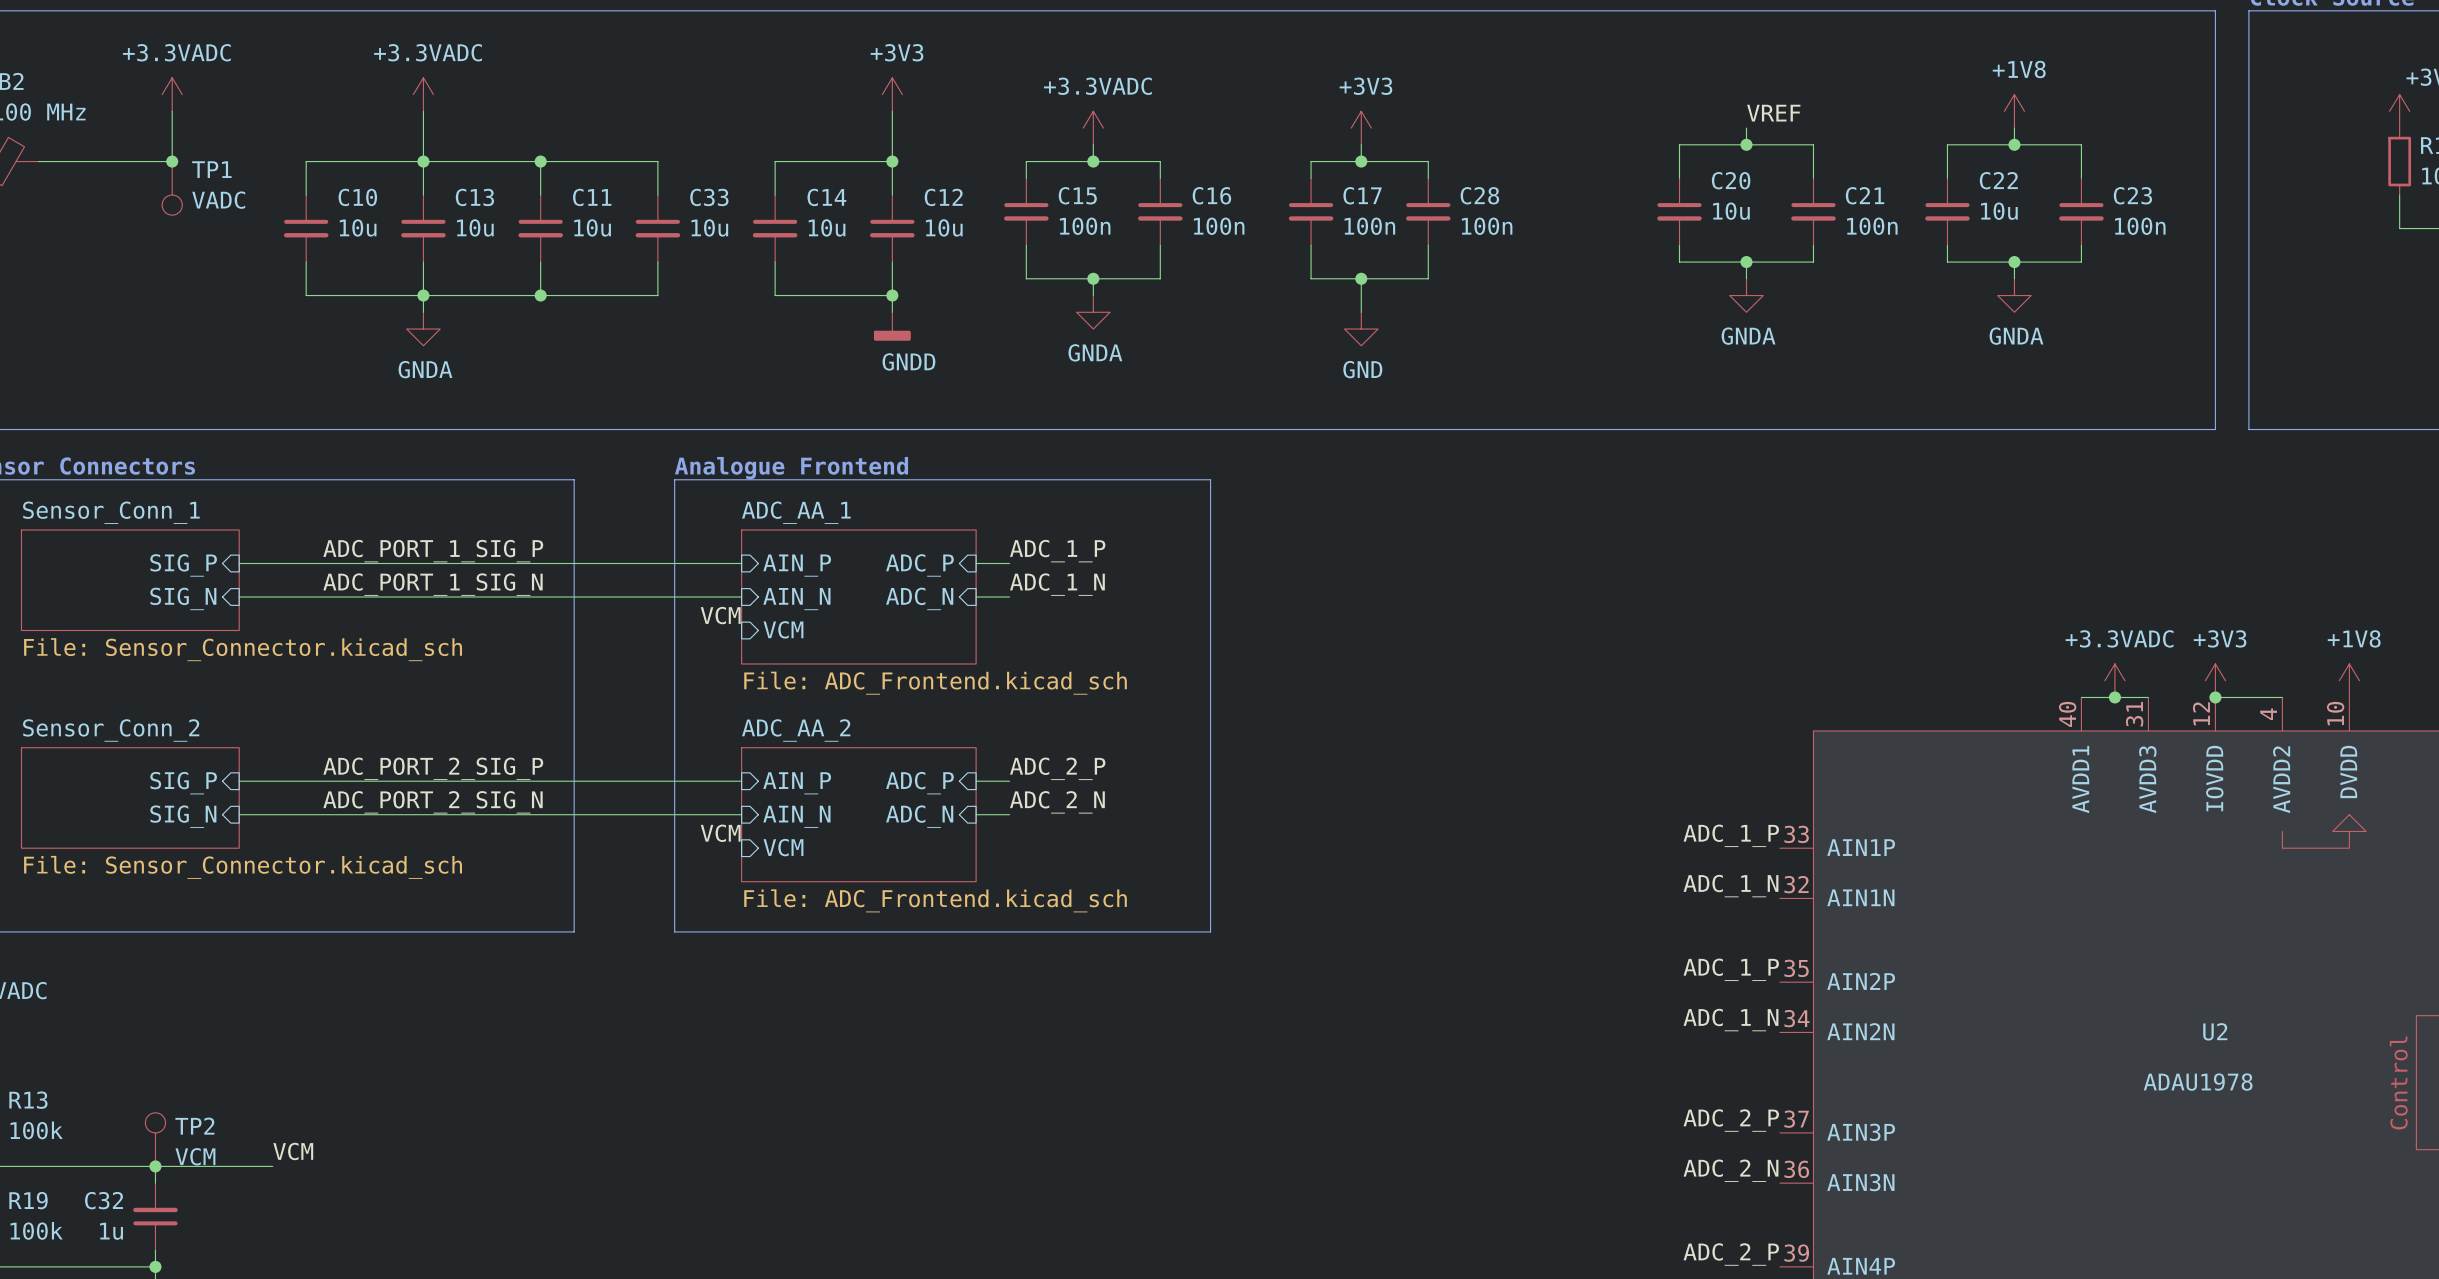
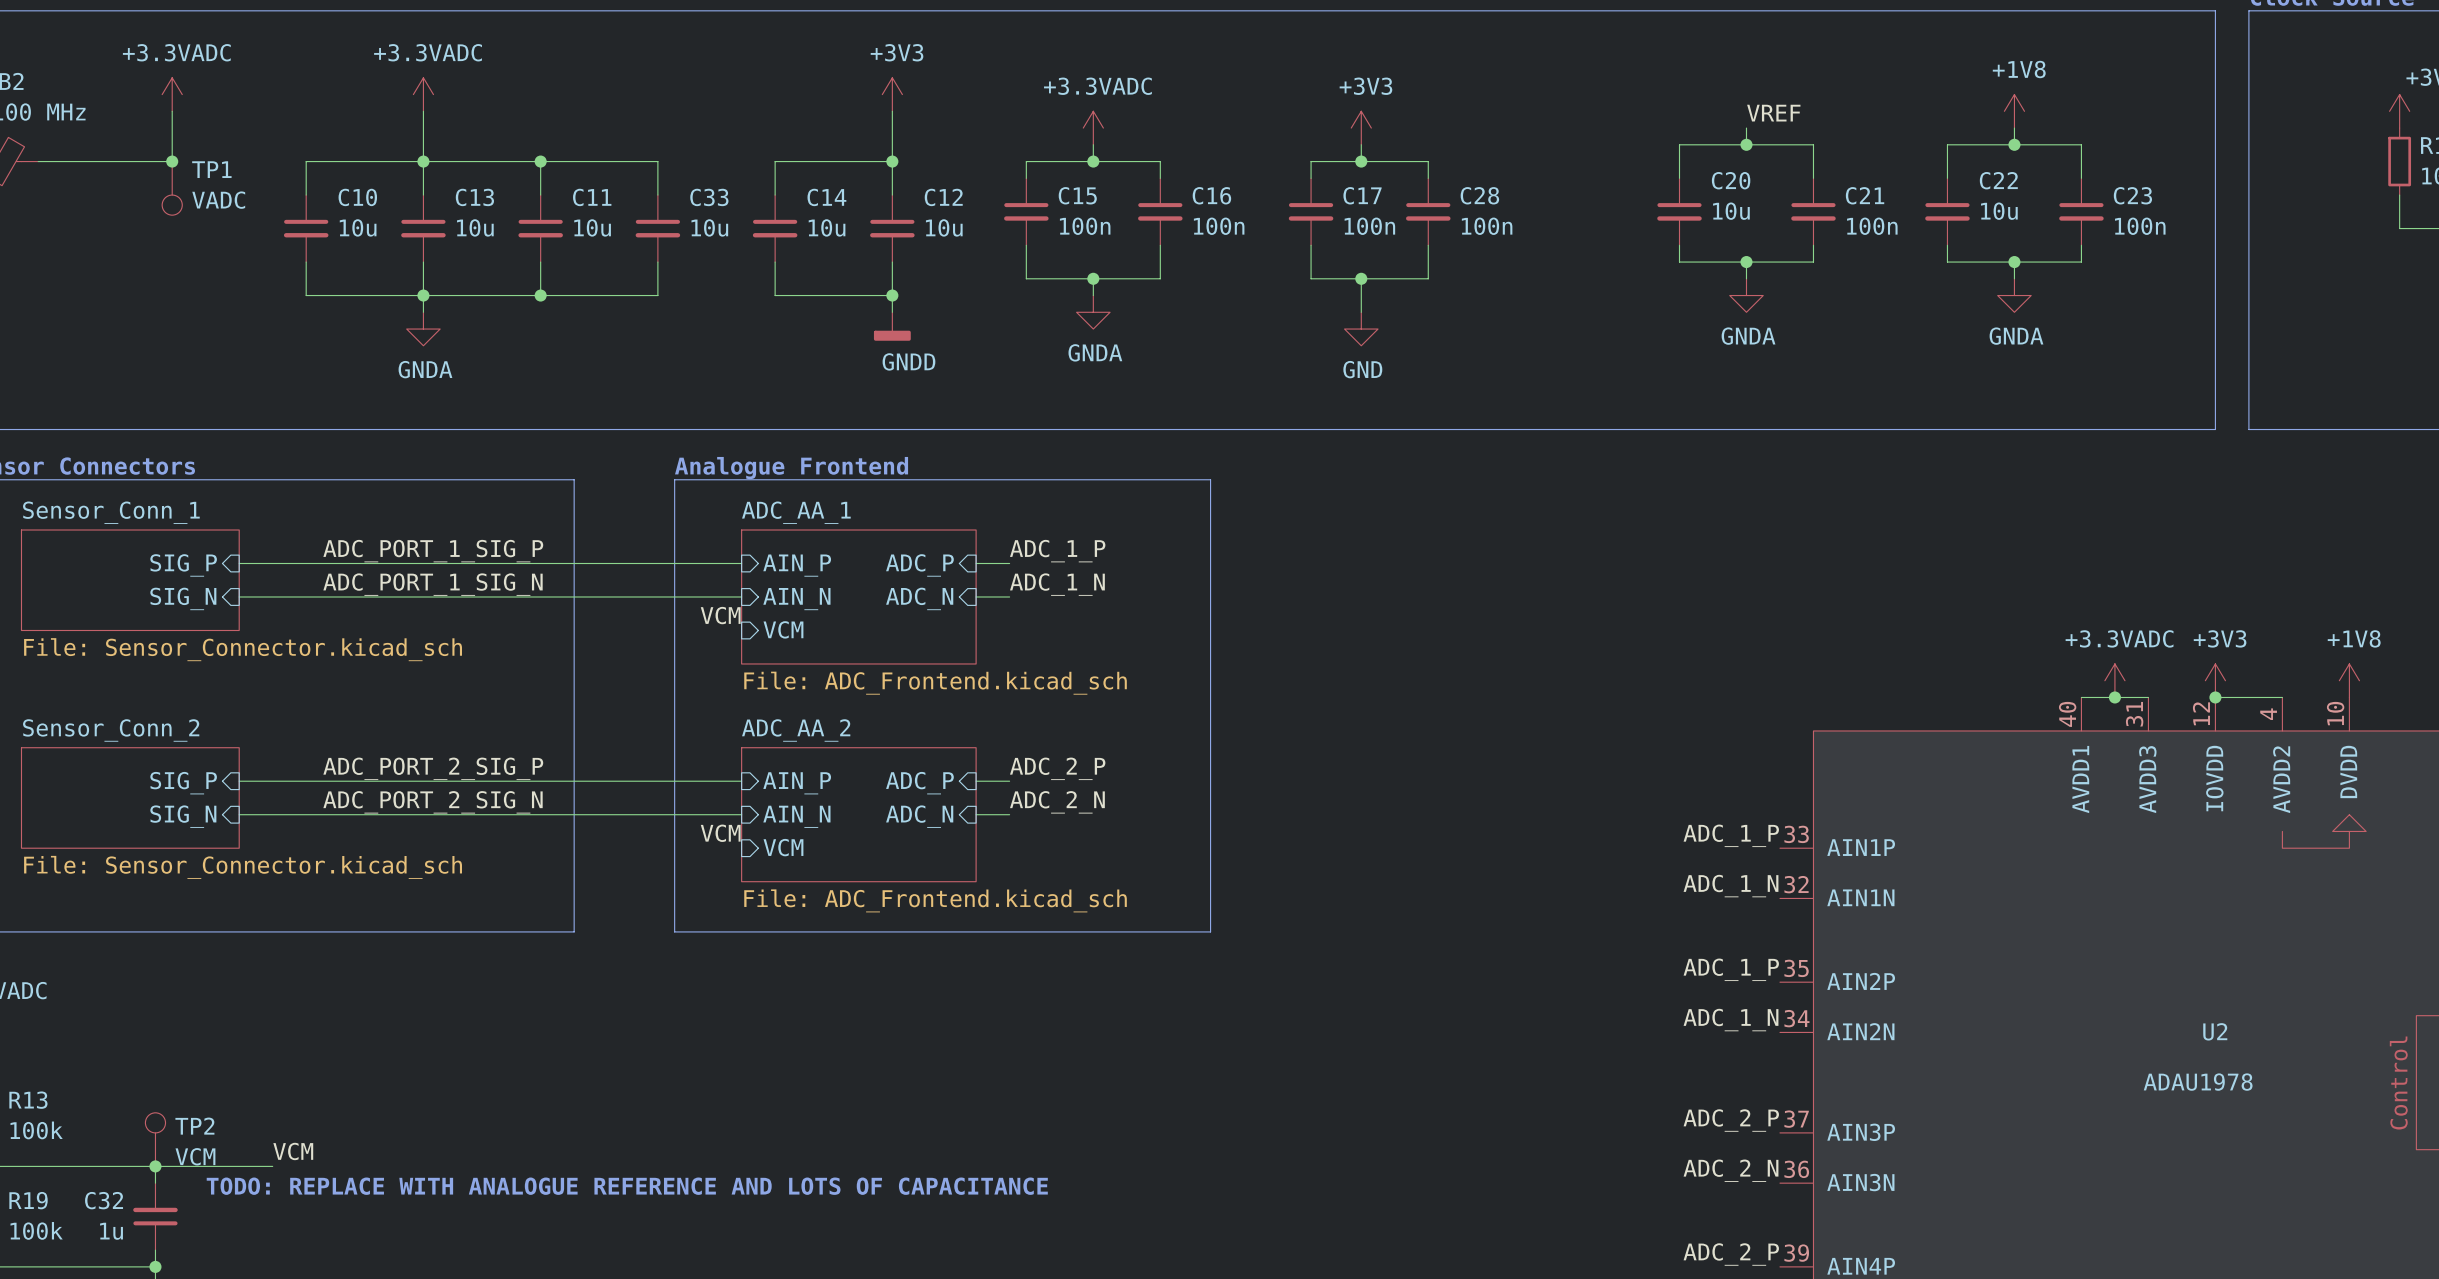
text: none -> TODO: REPLACE WITH ANALOGUE REFERENCE AND LOTS OF CAPACITANCE (627, 1186)

